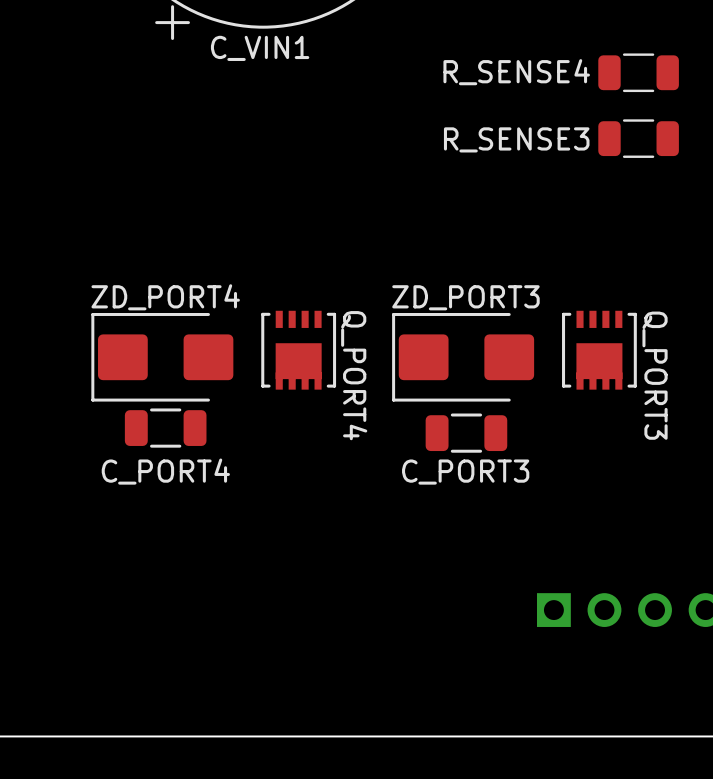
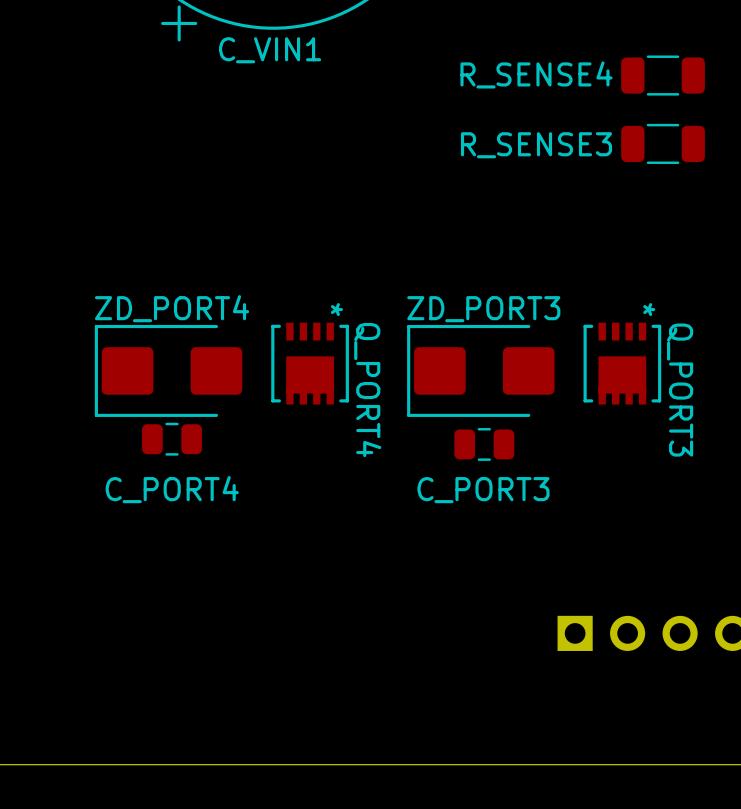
part text: none -> * (336, 309)
part text: none -> * (649, 309)
part footprint: [124, 408, 207, 448] -> [142, 422, 202, 456]
part footprint: [425, 413, 508, 453] -> [454, 428, 515, 461]

